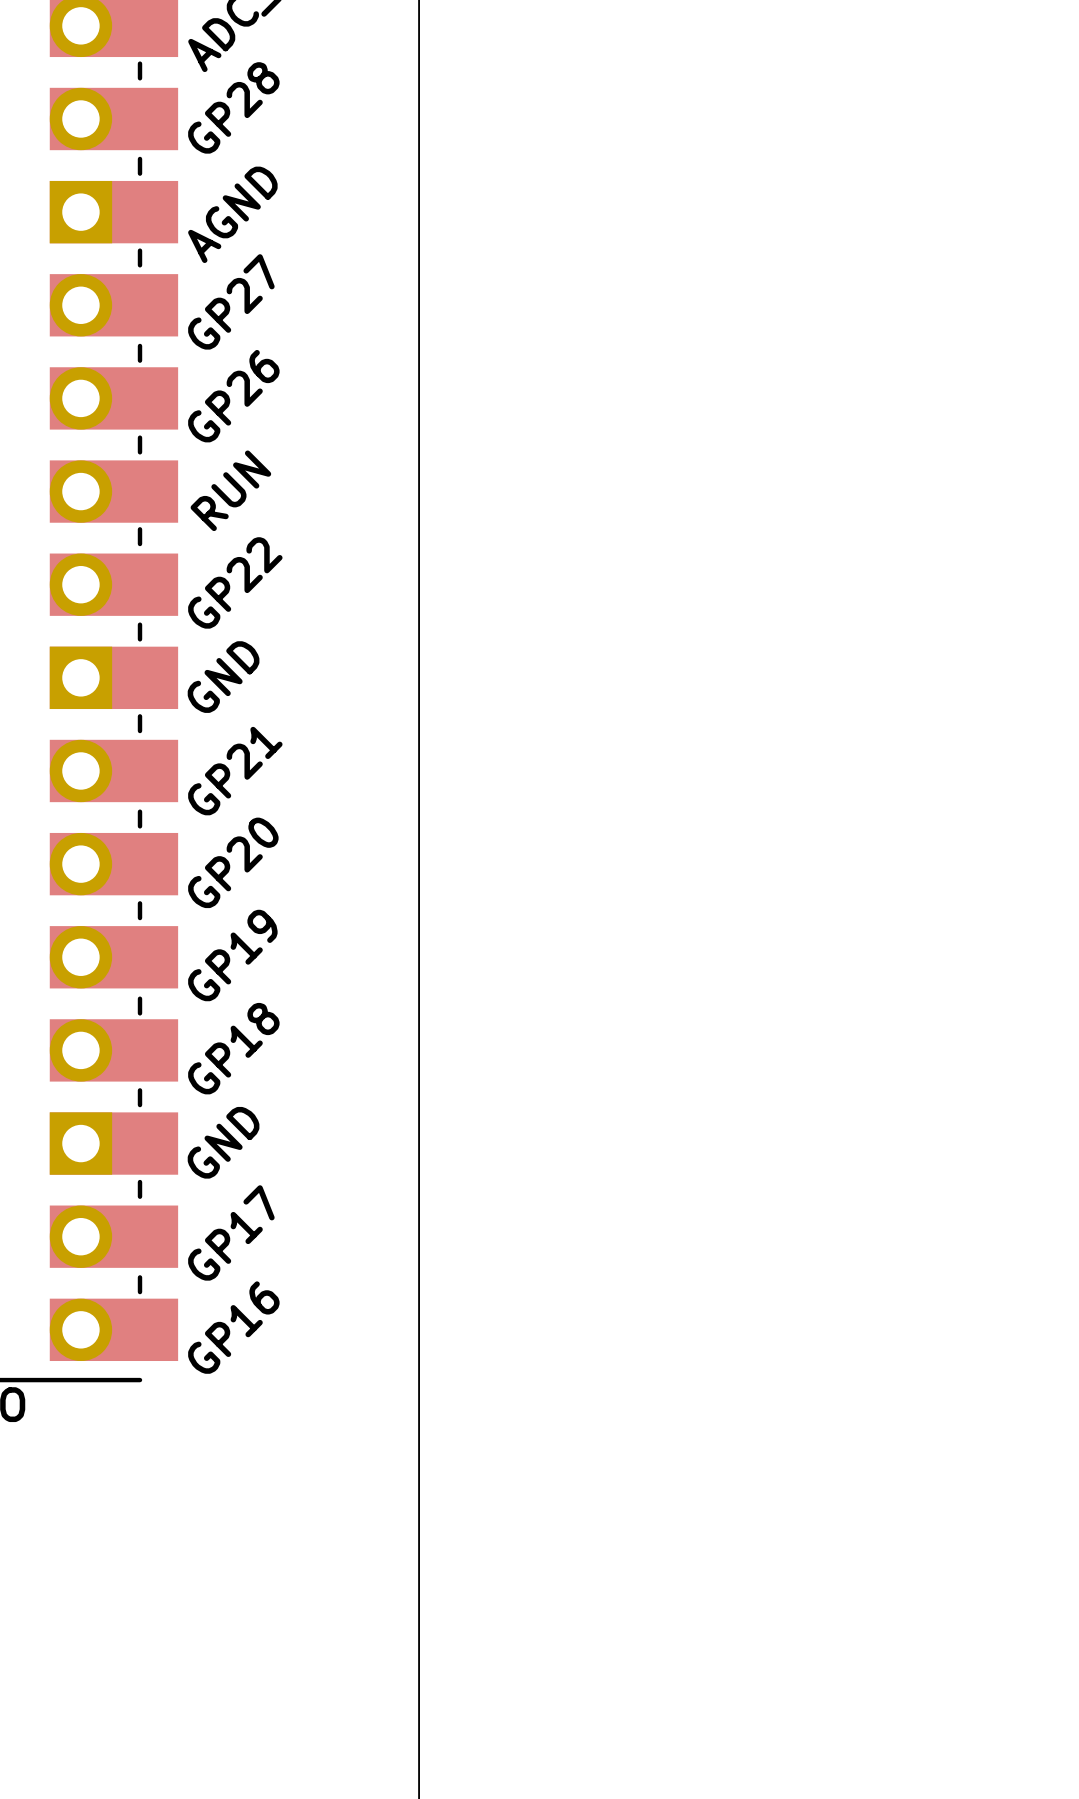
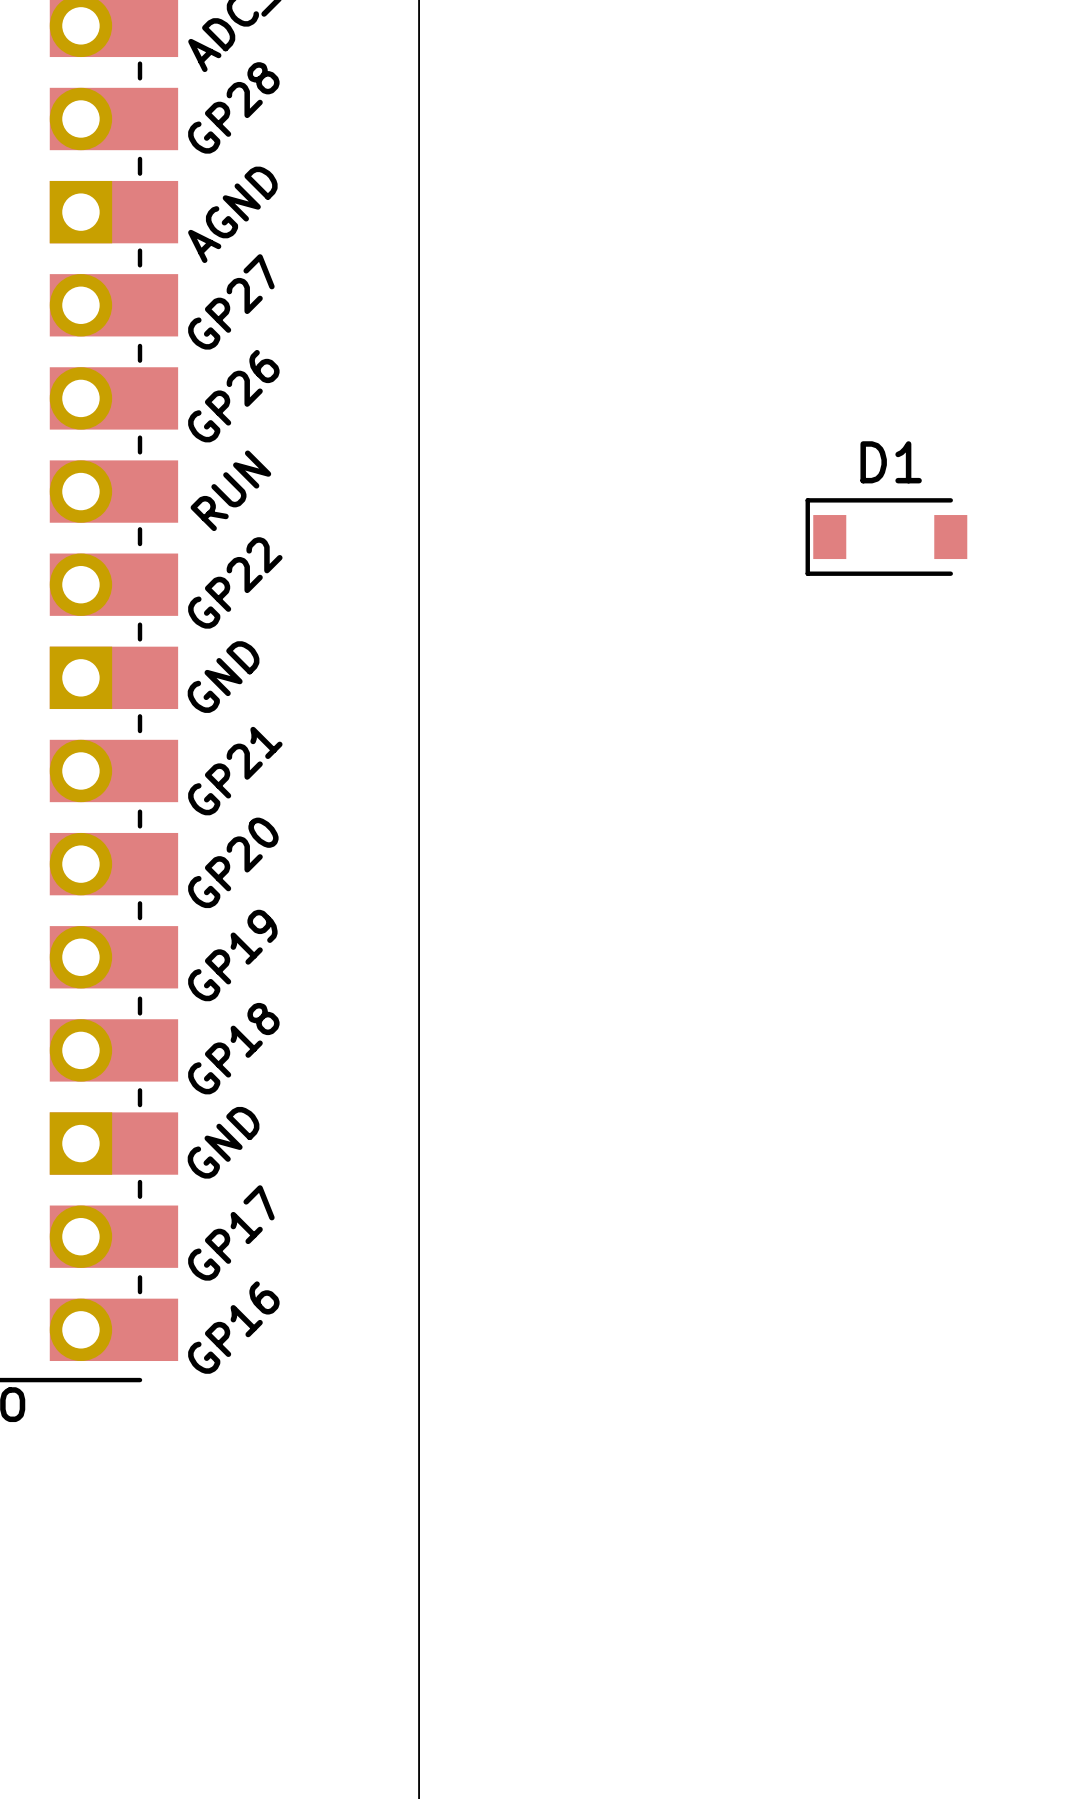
D1: none -> (886, 537)

